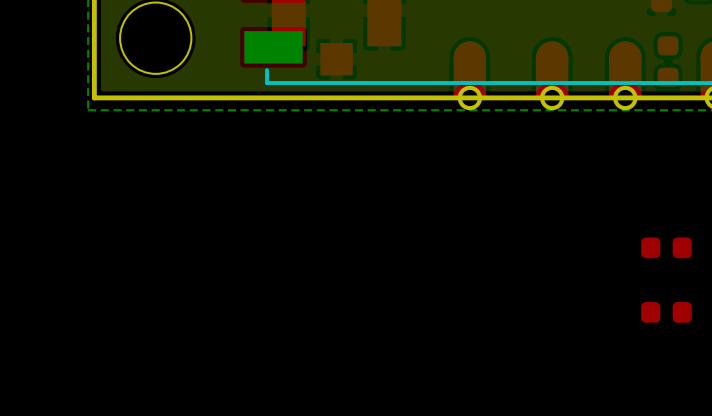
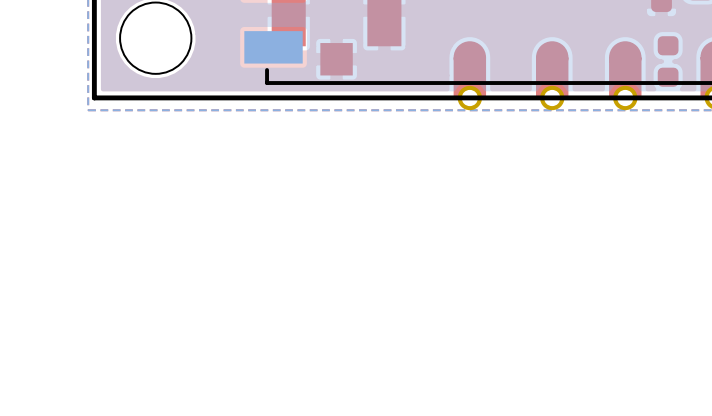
part: (666, 247) -> none
part: (666, 312) -> none

